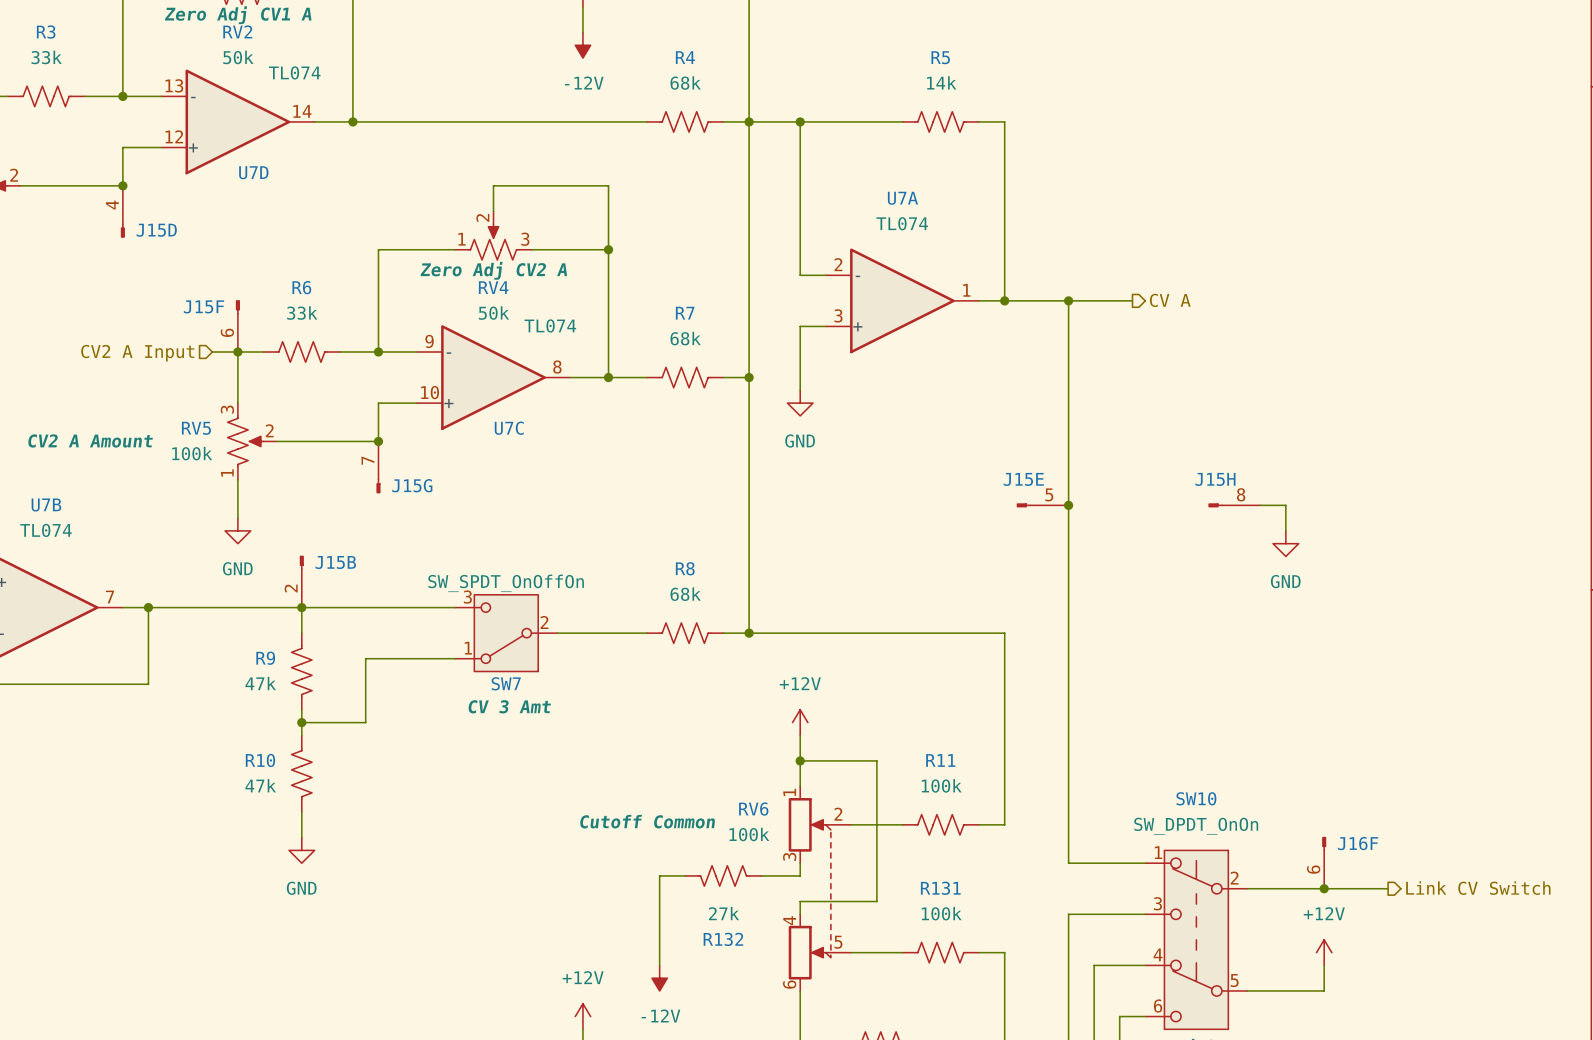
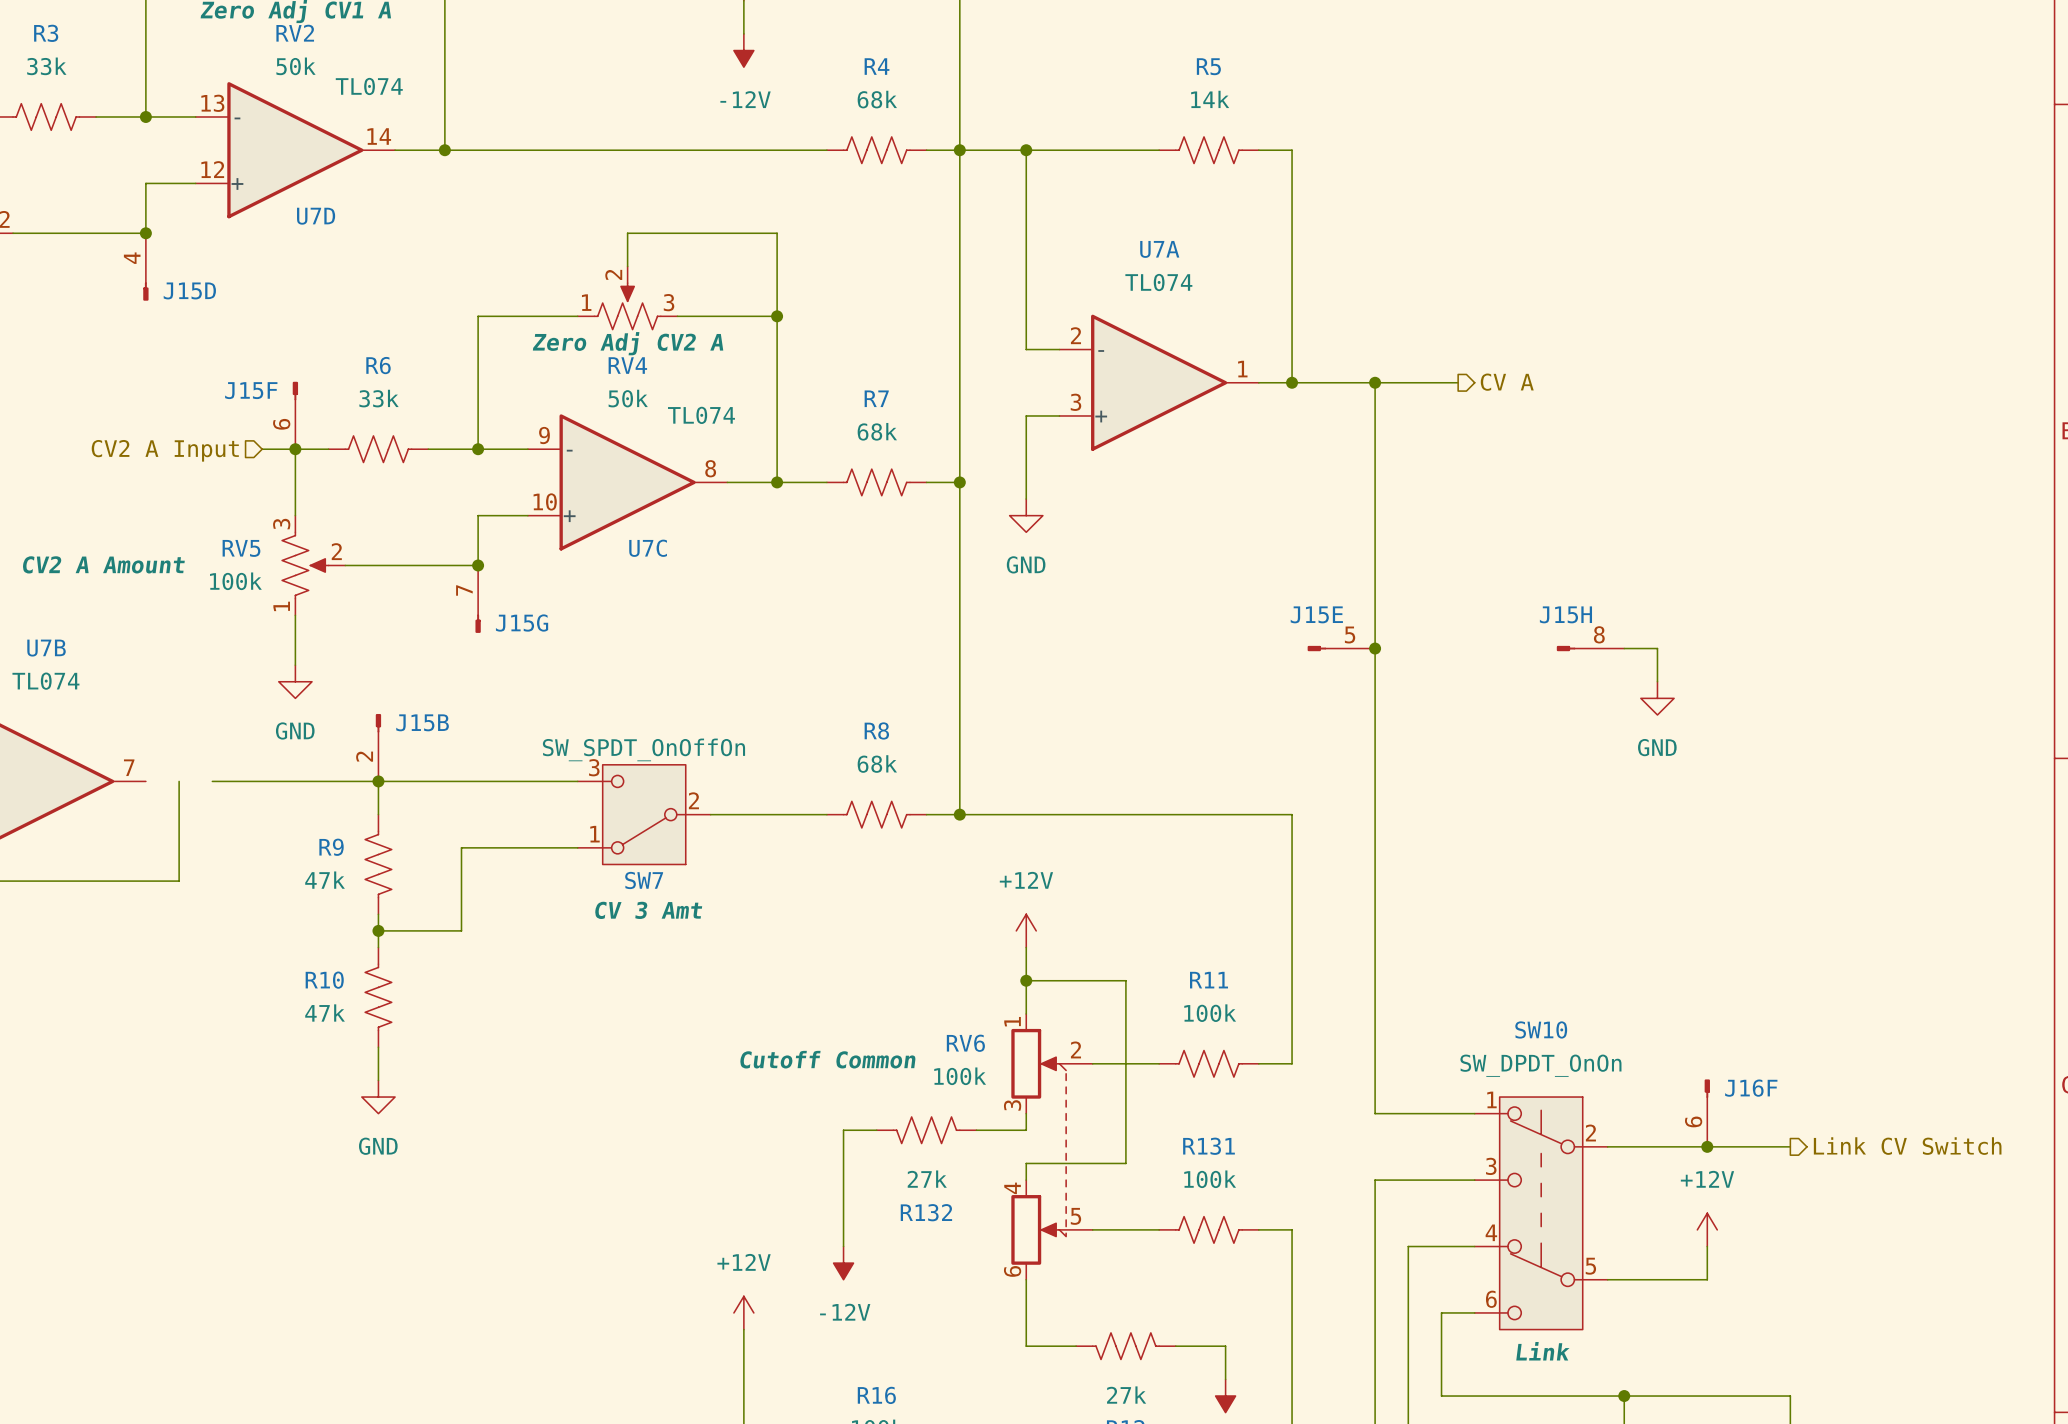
wire: (122, 607) (174, 607) -> none
junction: (148, 607) -> none

